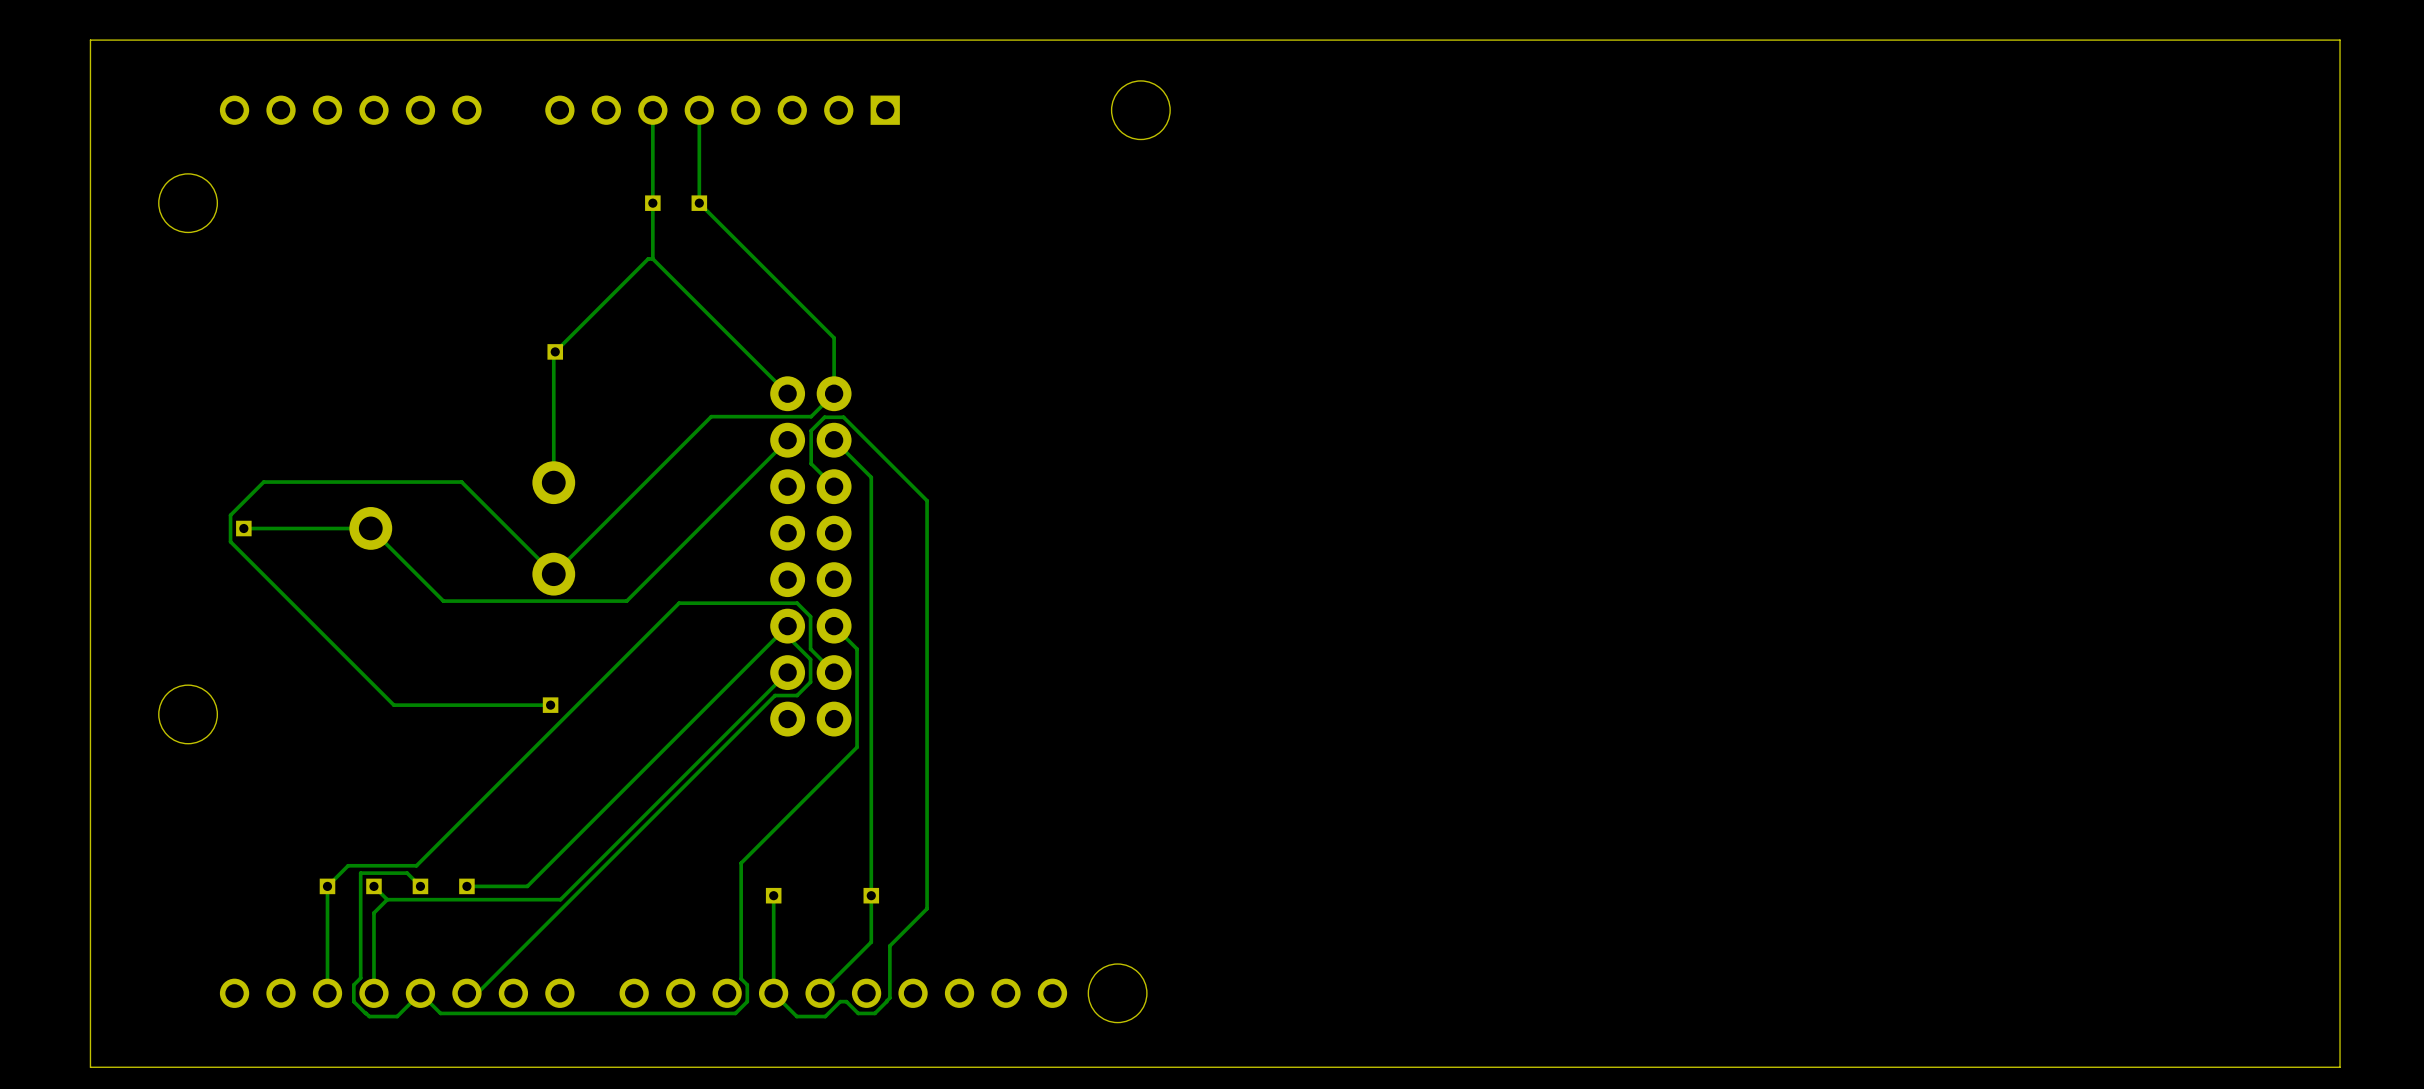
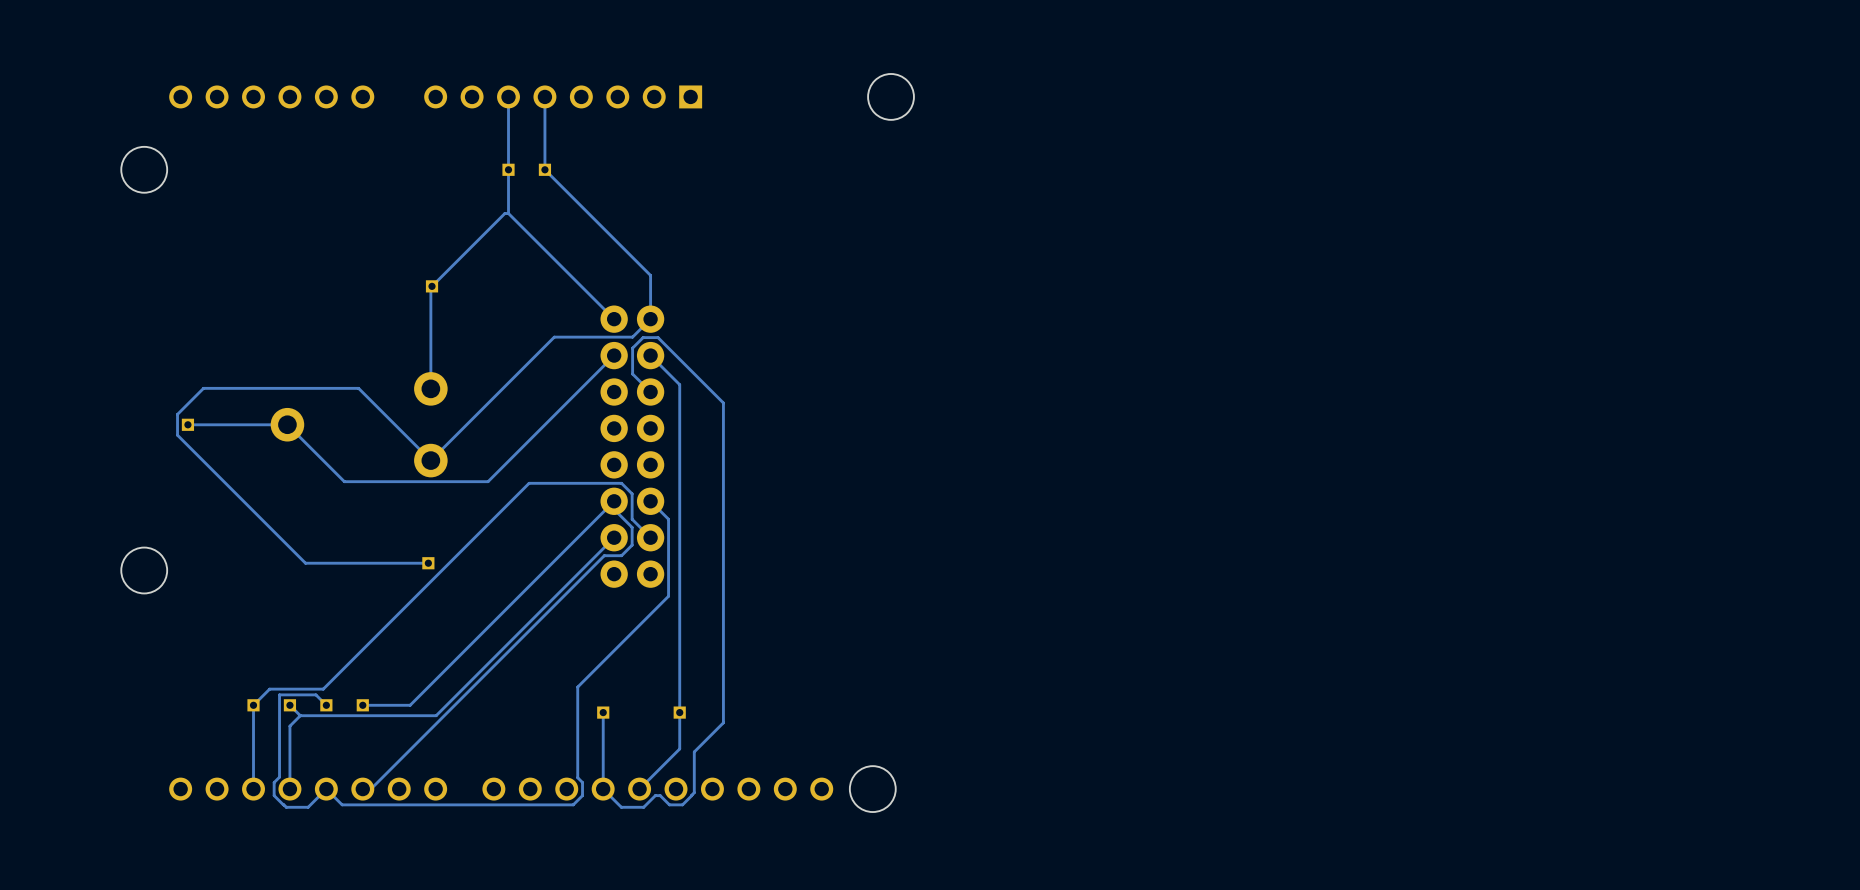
board edge: (2340, 40) (90, 40) (90, 1067) (2340, 1067) (2340, 40) -> none

